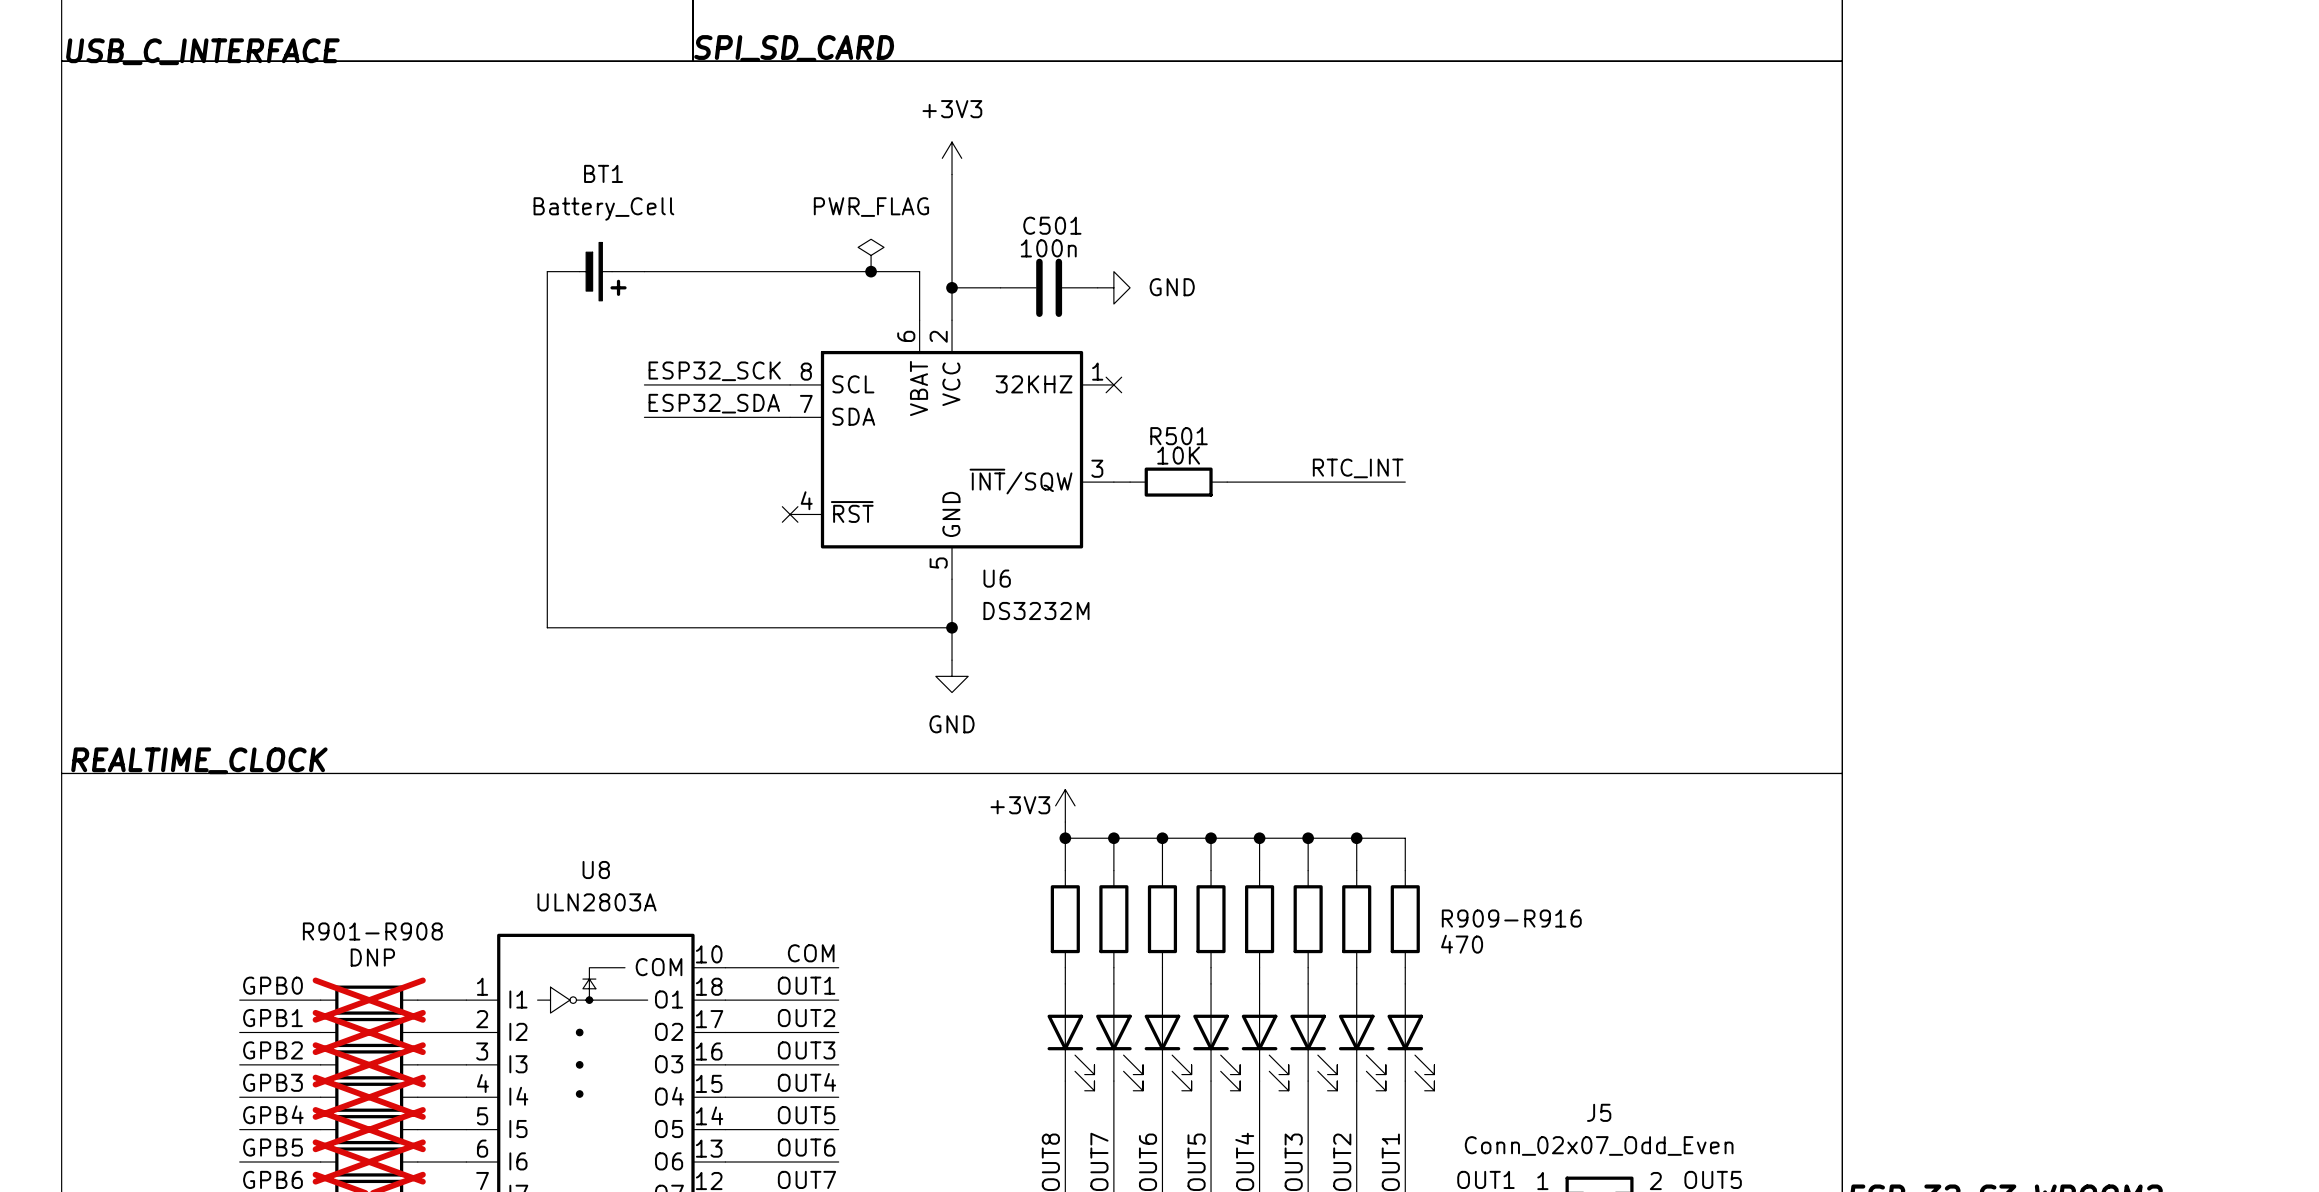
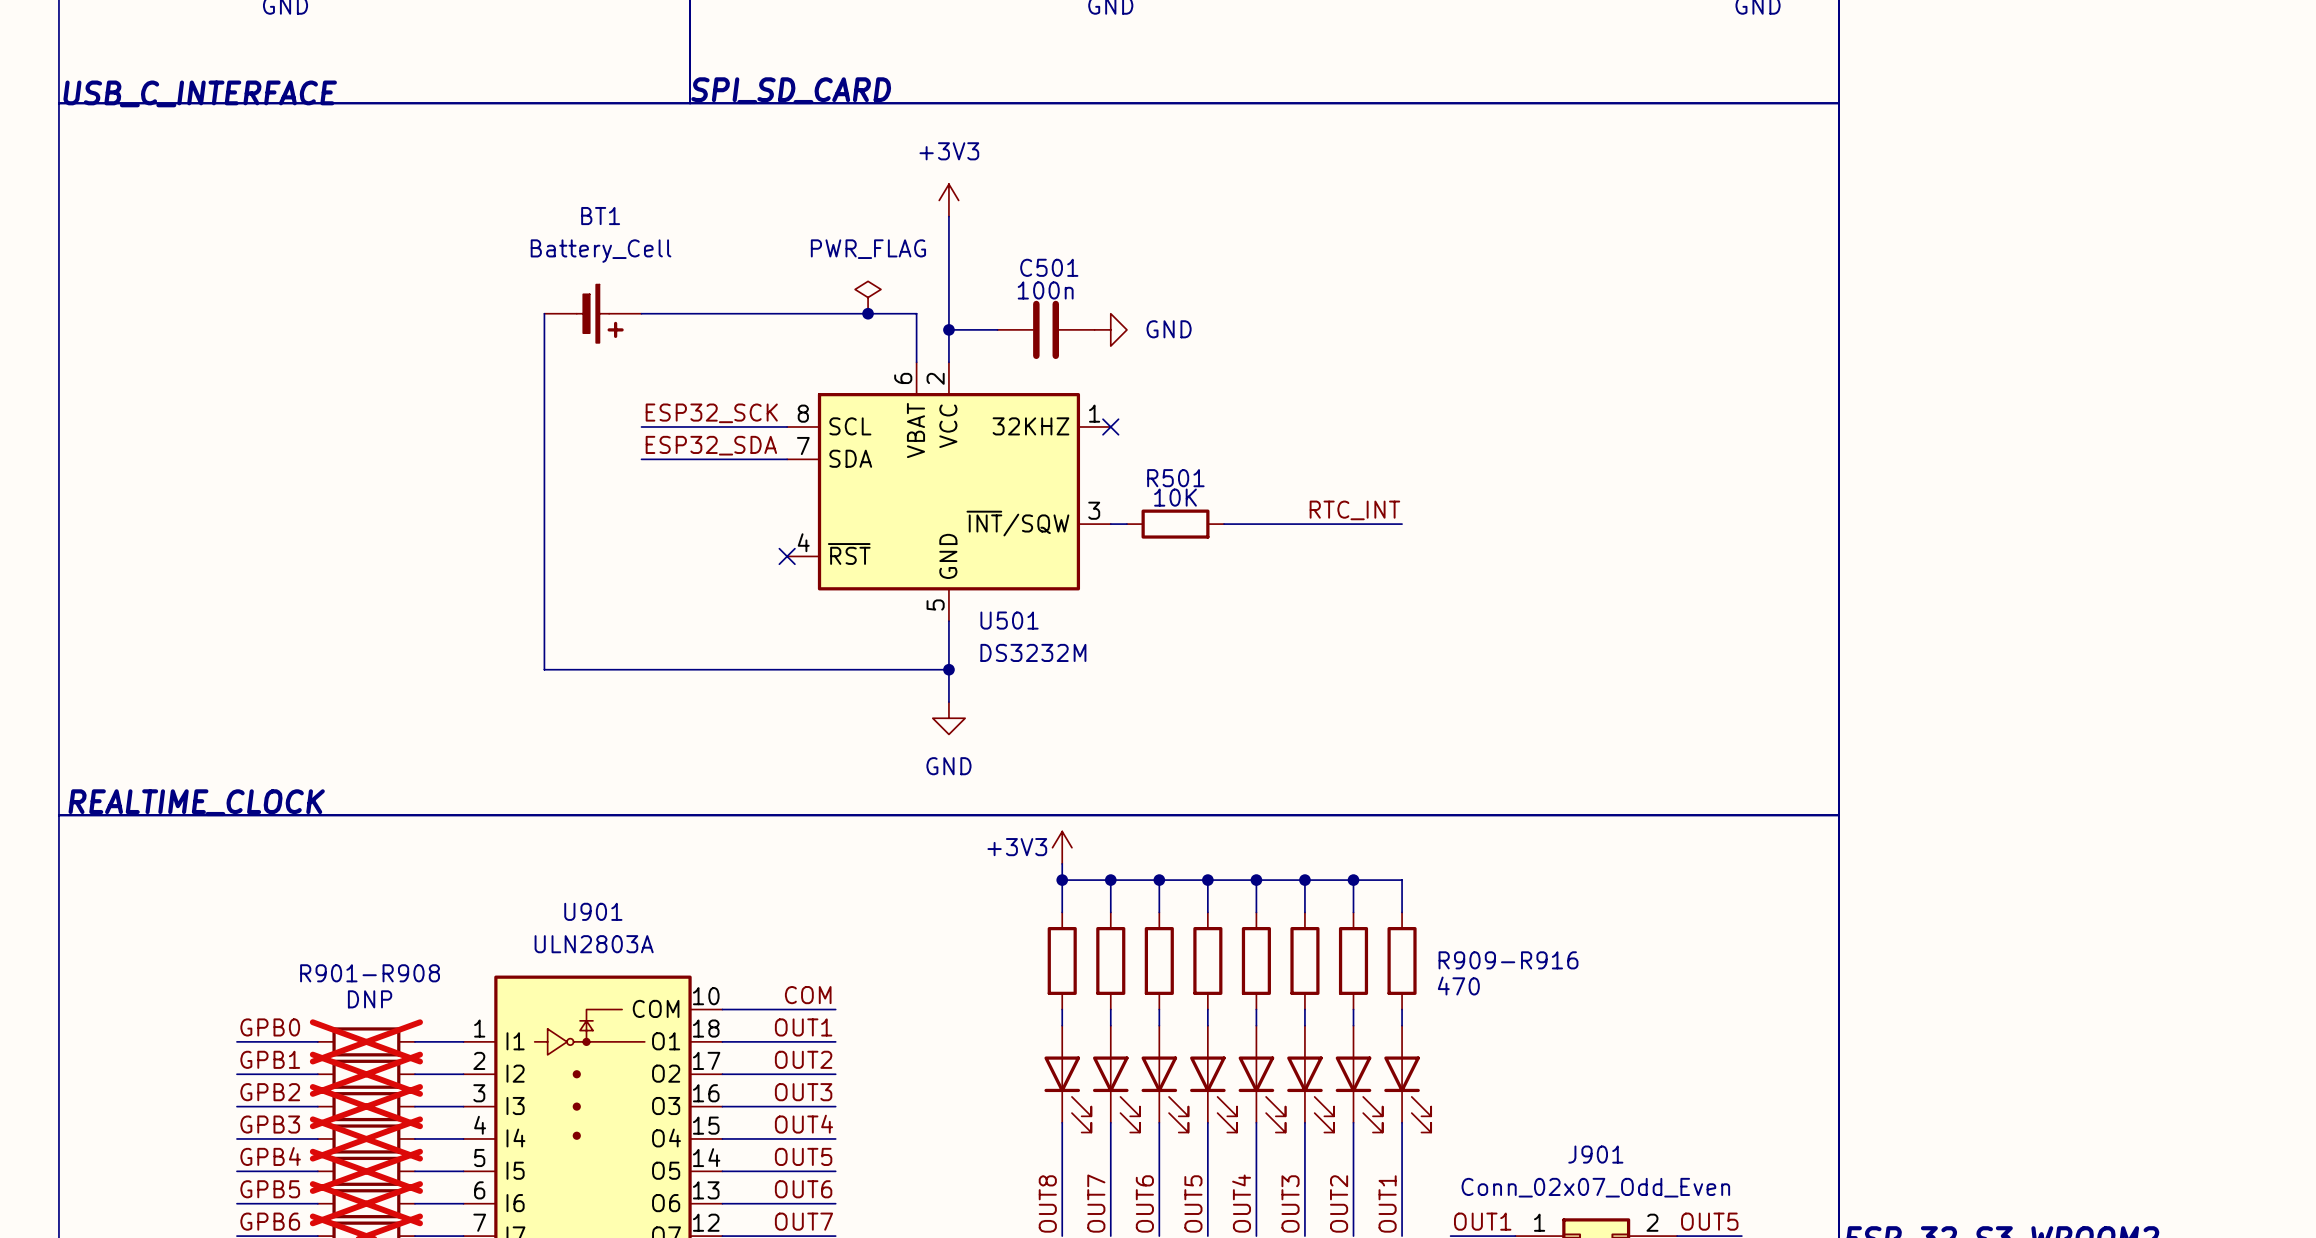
U6 name: U6 (997, 578) -> U501 (1009, 620)
U8 name: U8 (596, 870) -> U901 (593, 911)
J5 name: J5 (1599, 1112) -> J901 (1595, 1154)

